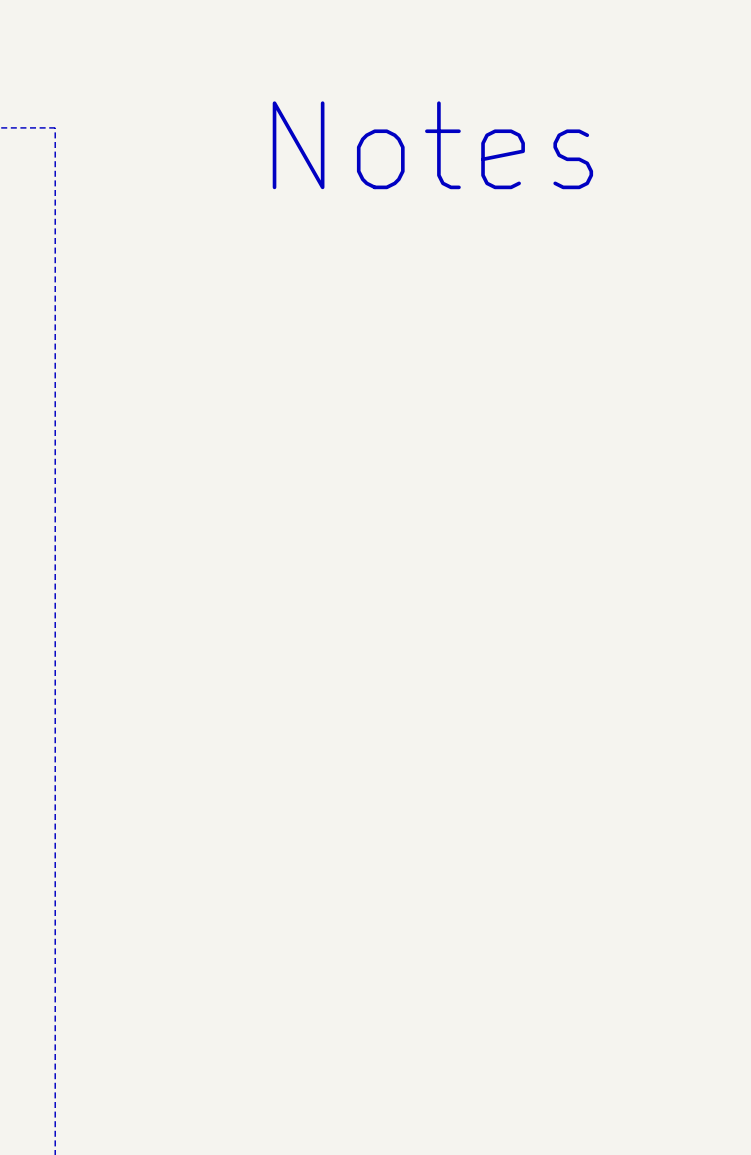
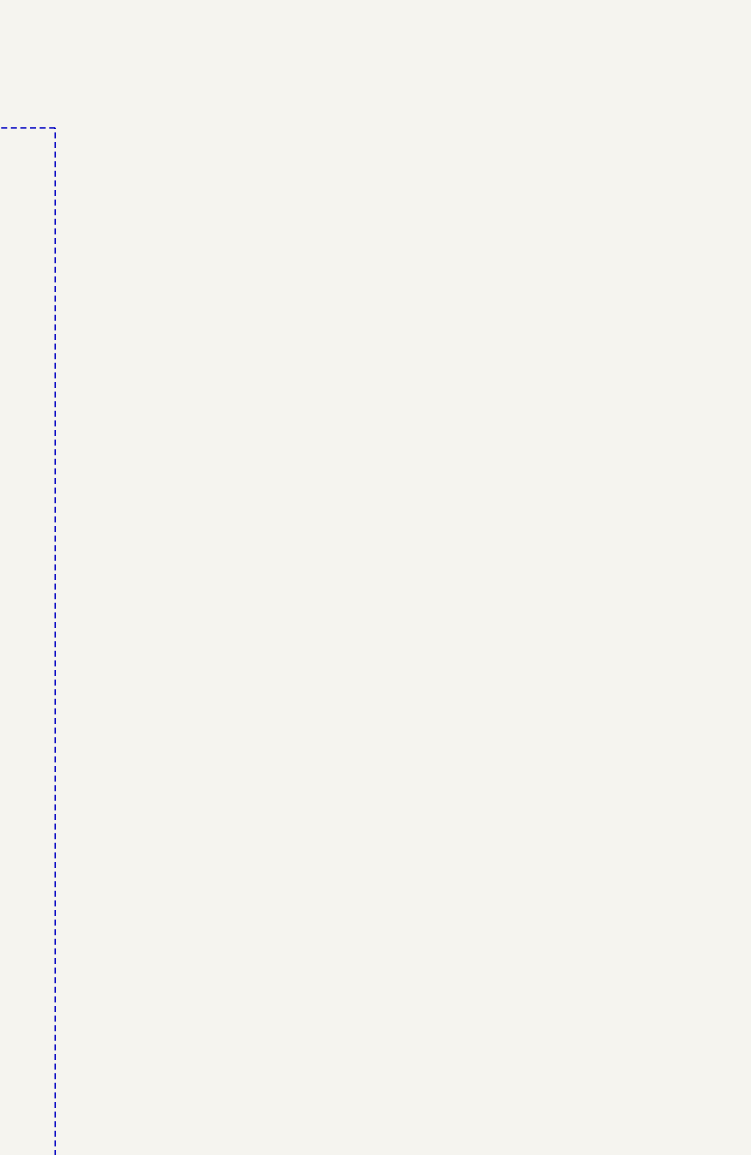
text: Notes (432, 145) -> none

